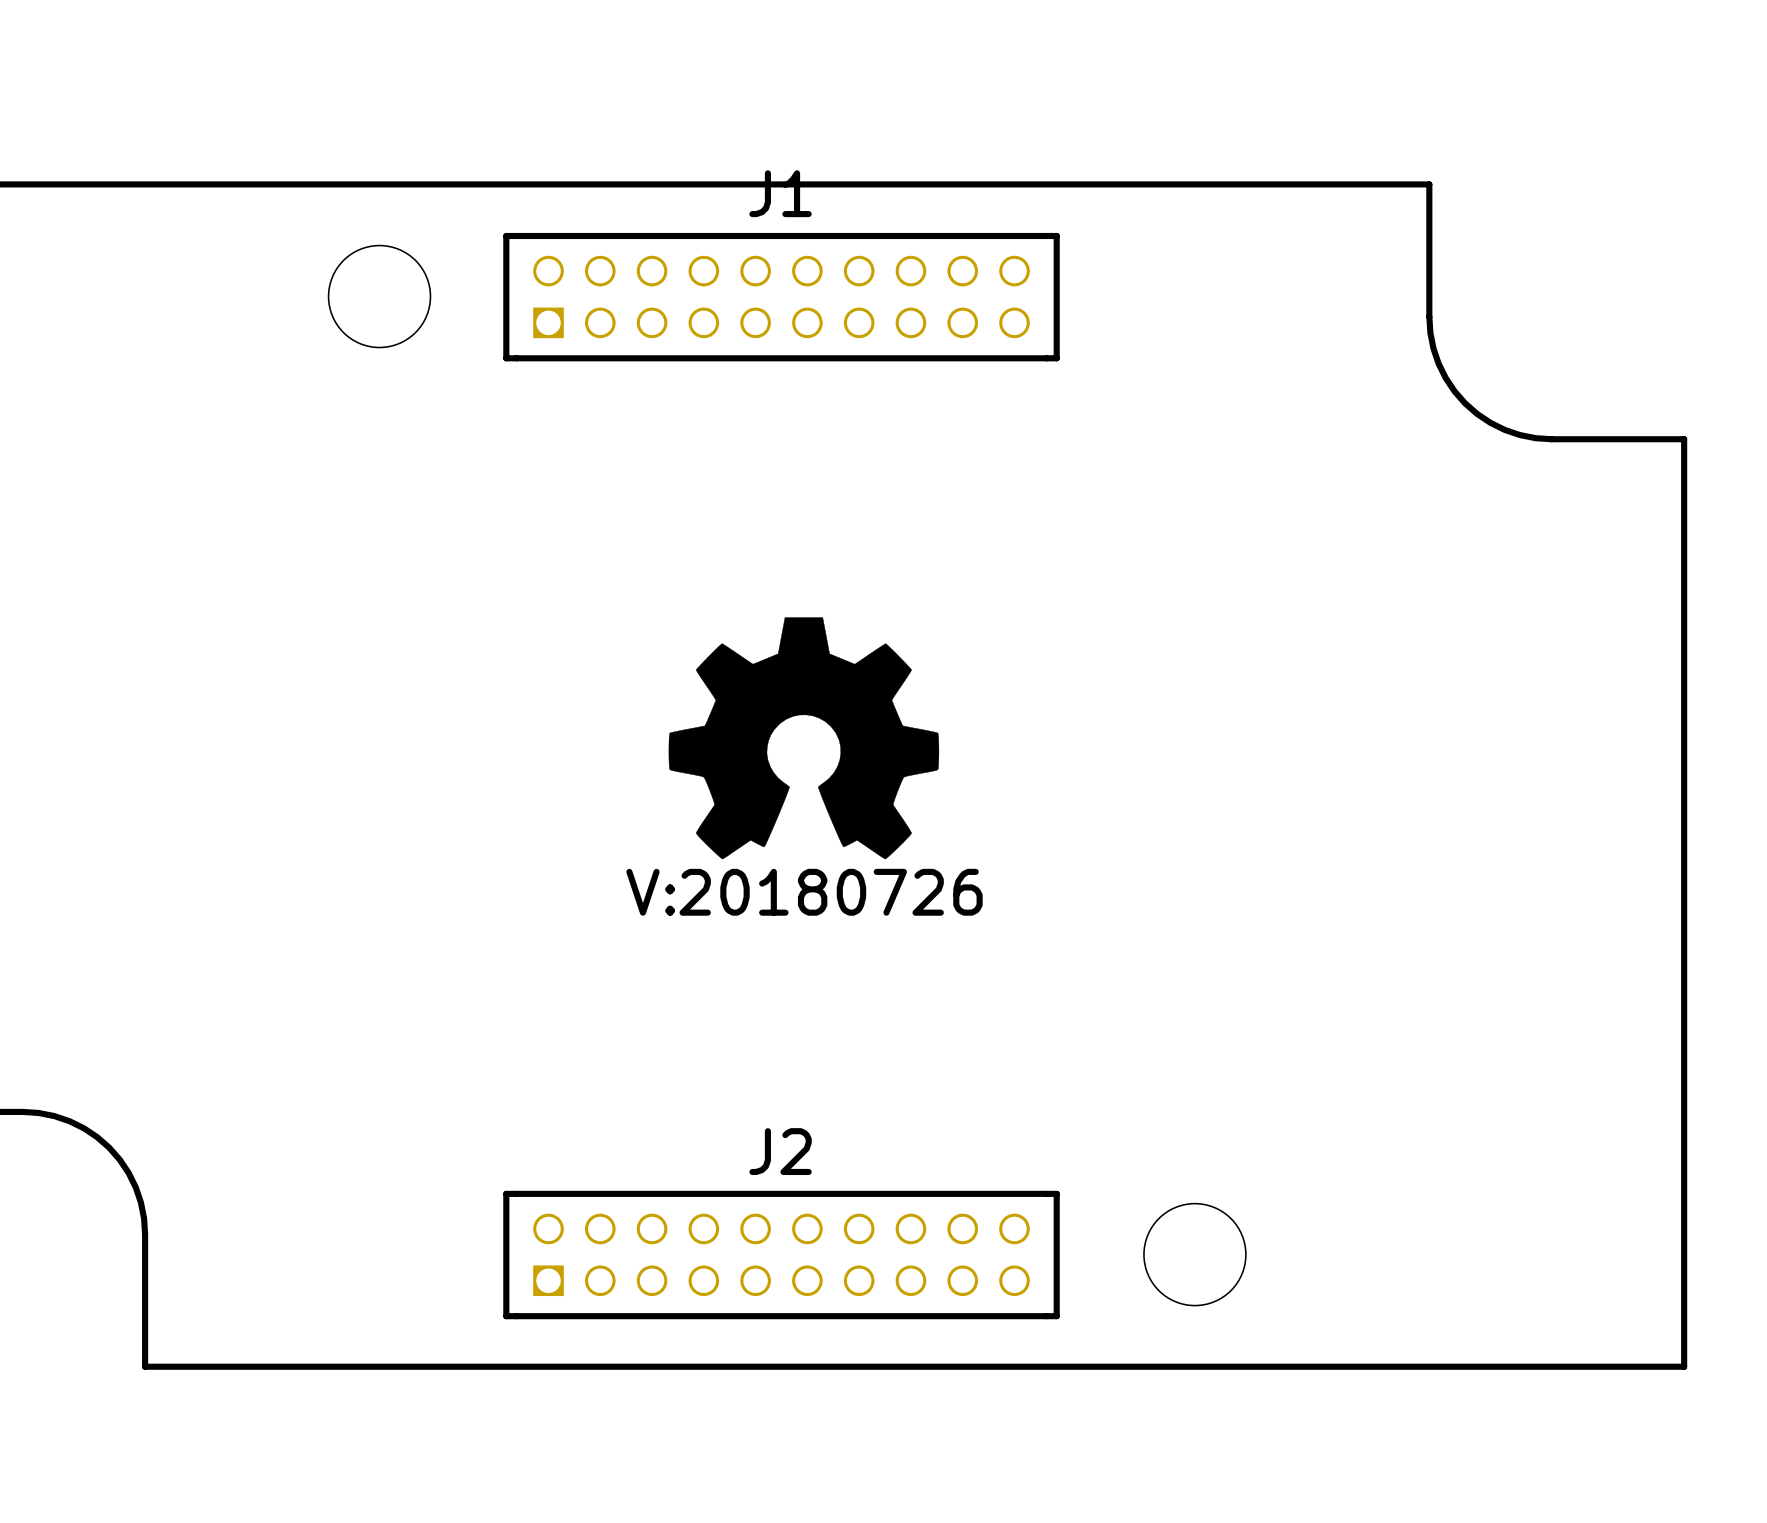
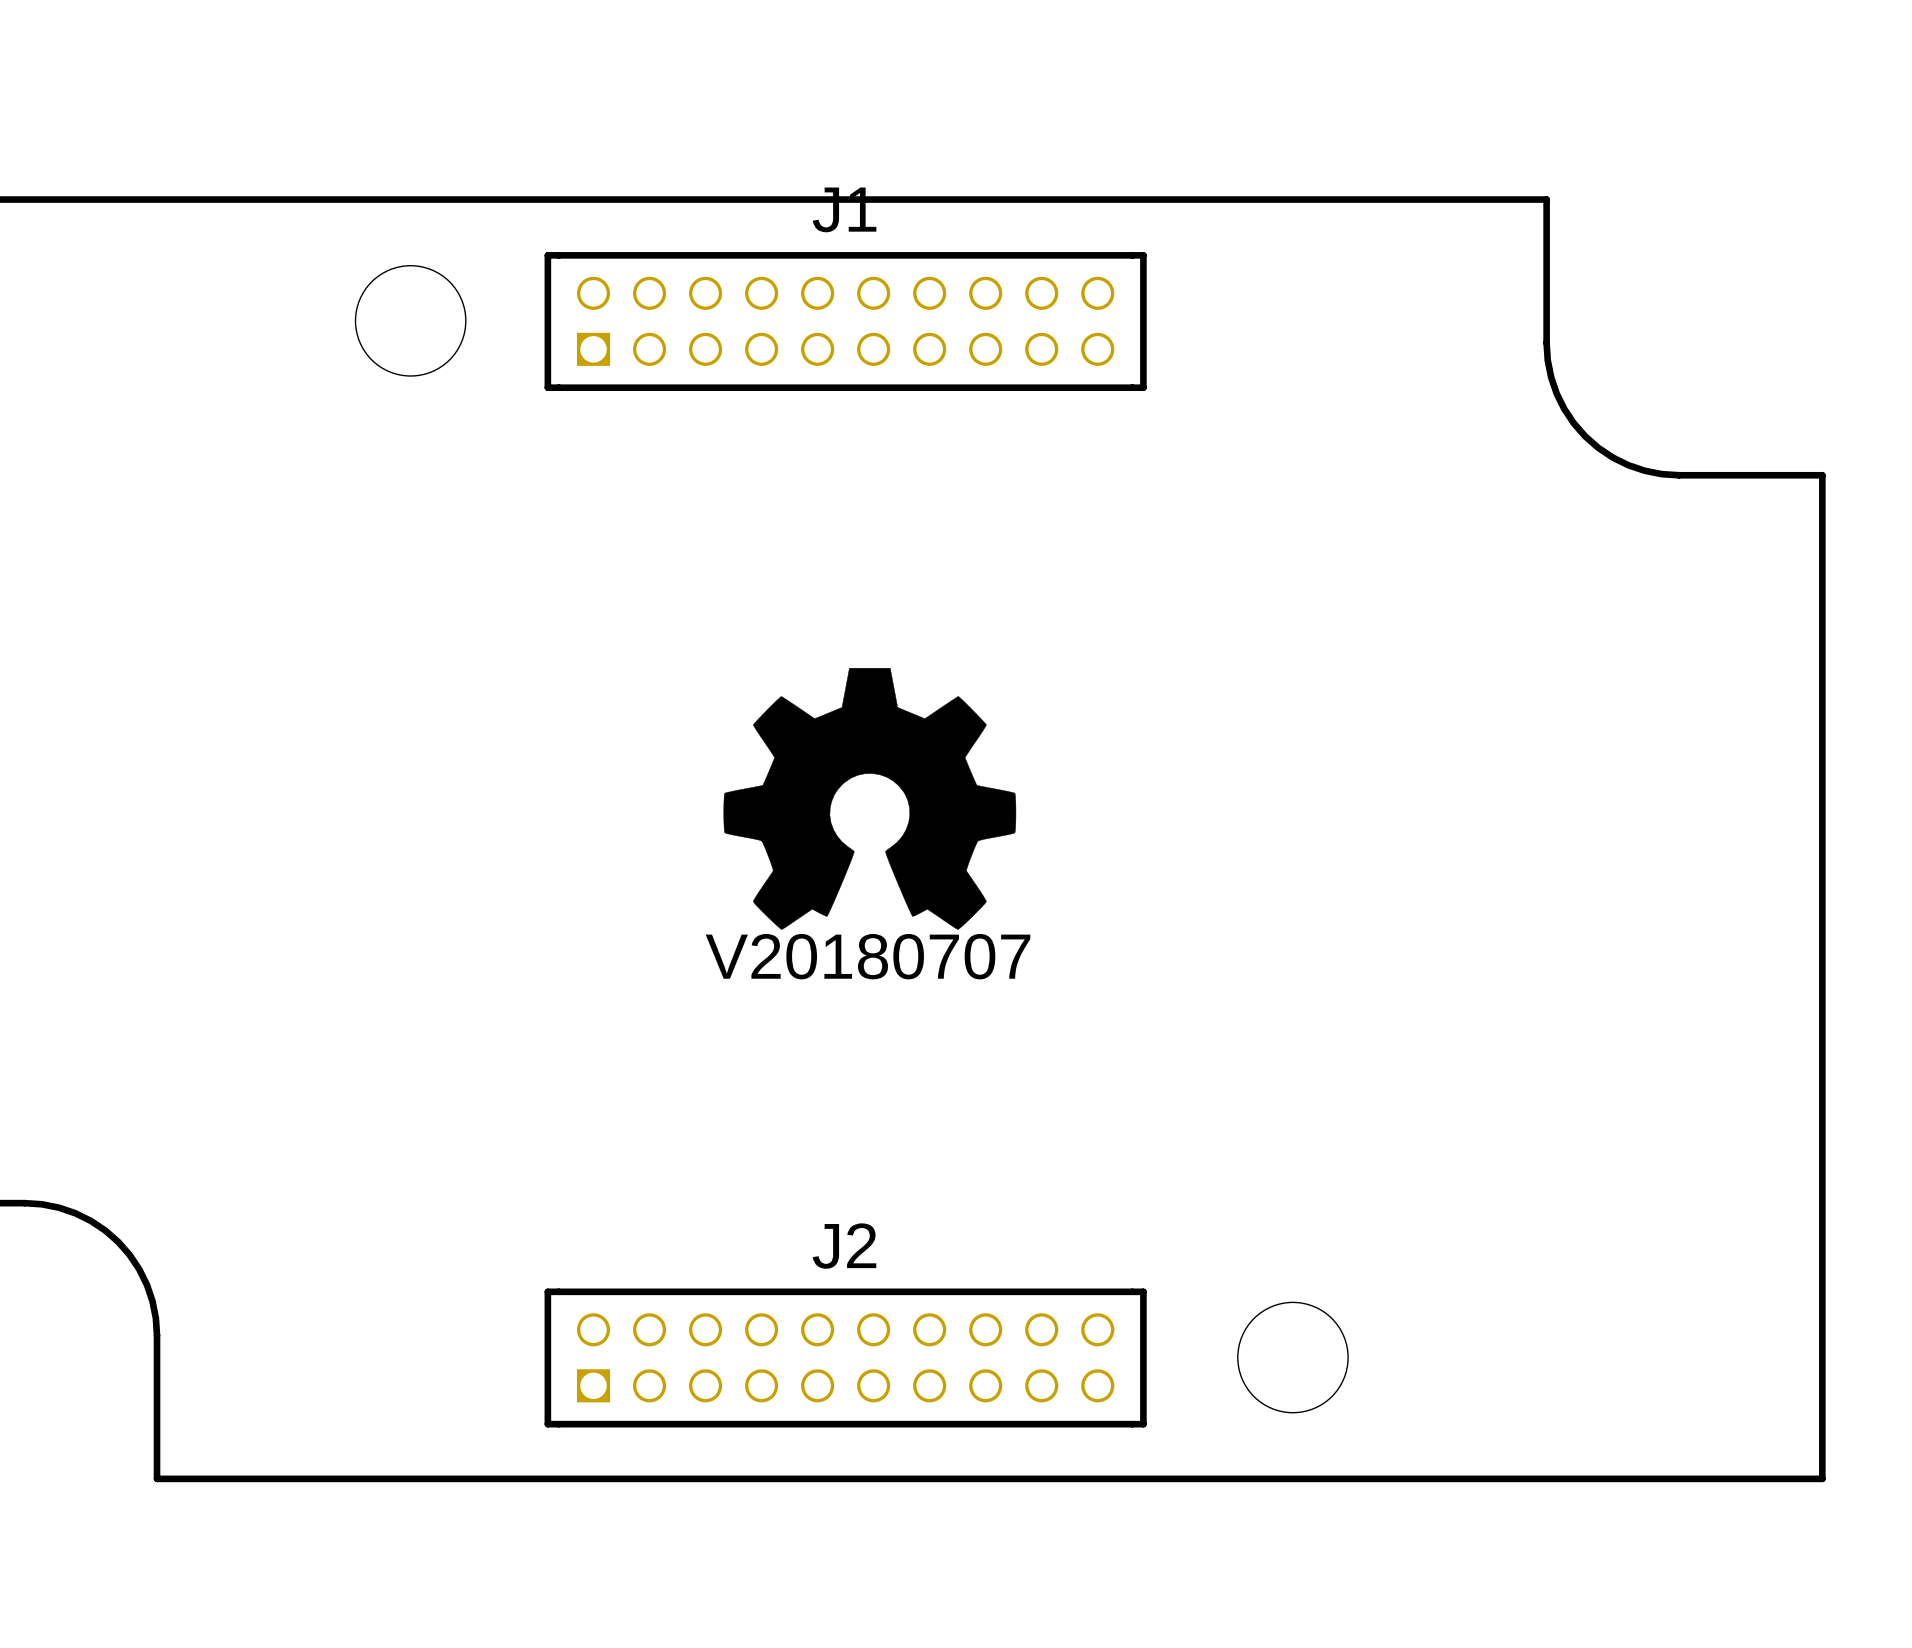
drawing shape: [626, 868, 983, 916] -> [705, 933, 1031, 980]

